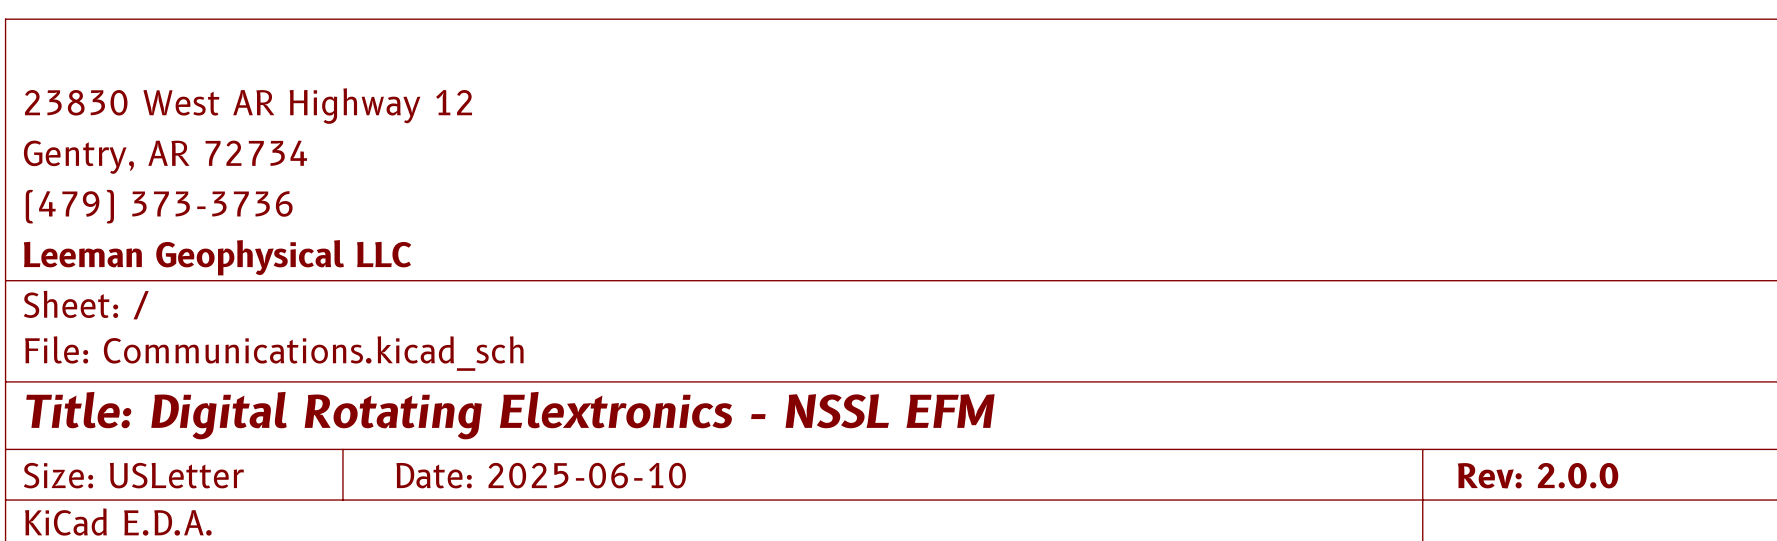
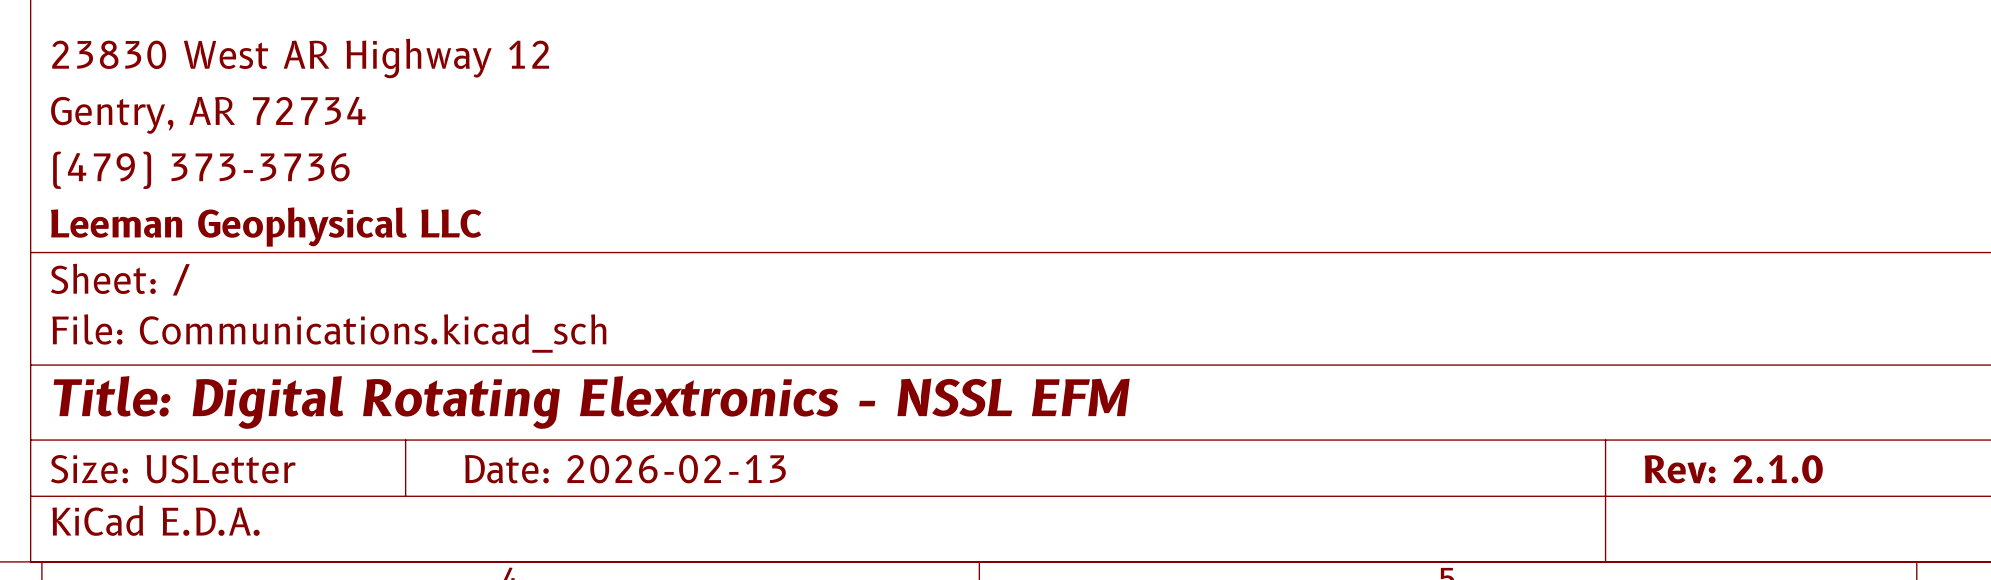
title block: Date: 2025-06-10 (541, 475) -> Date: 2026-02-13 (625, 469)
title block: Rev: 2.0.0 (1538, 475) -> Rev: 2.1.0 (1733, 469)

